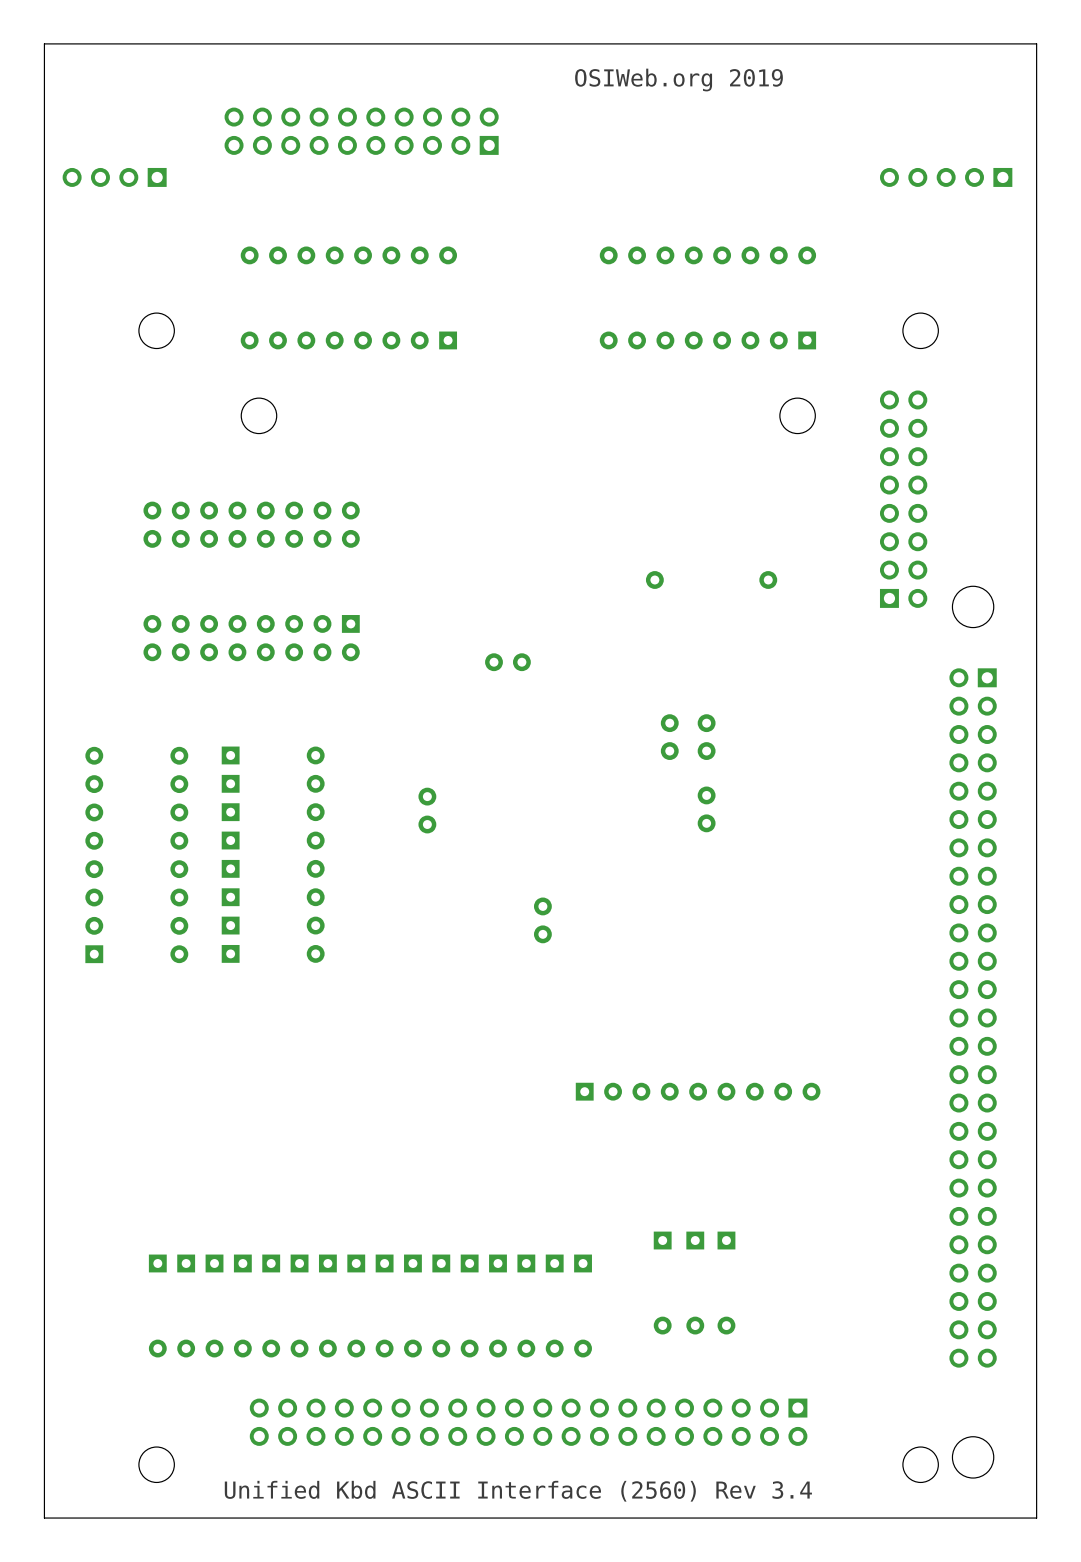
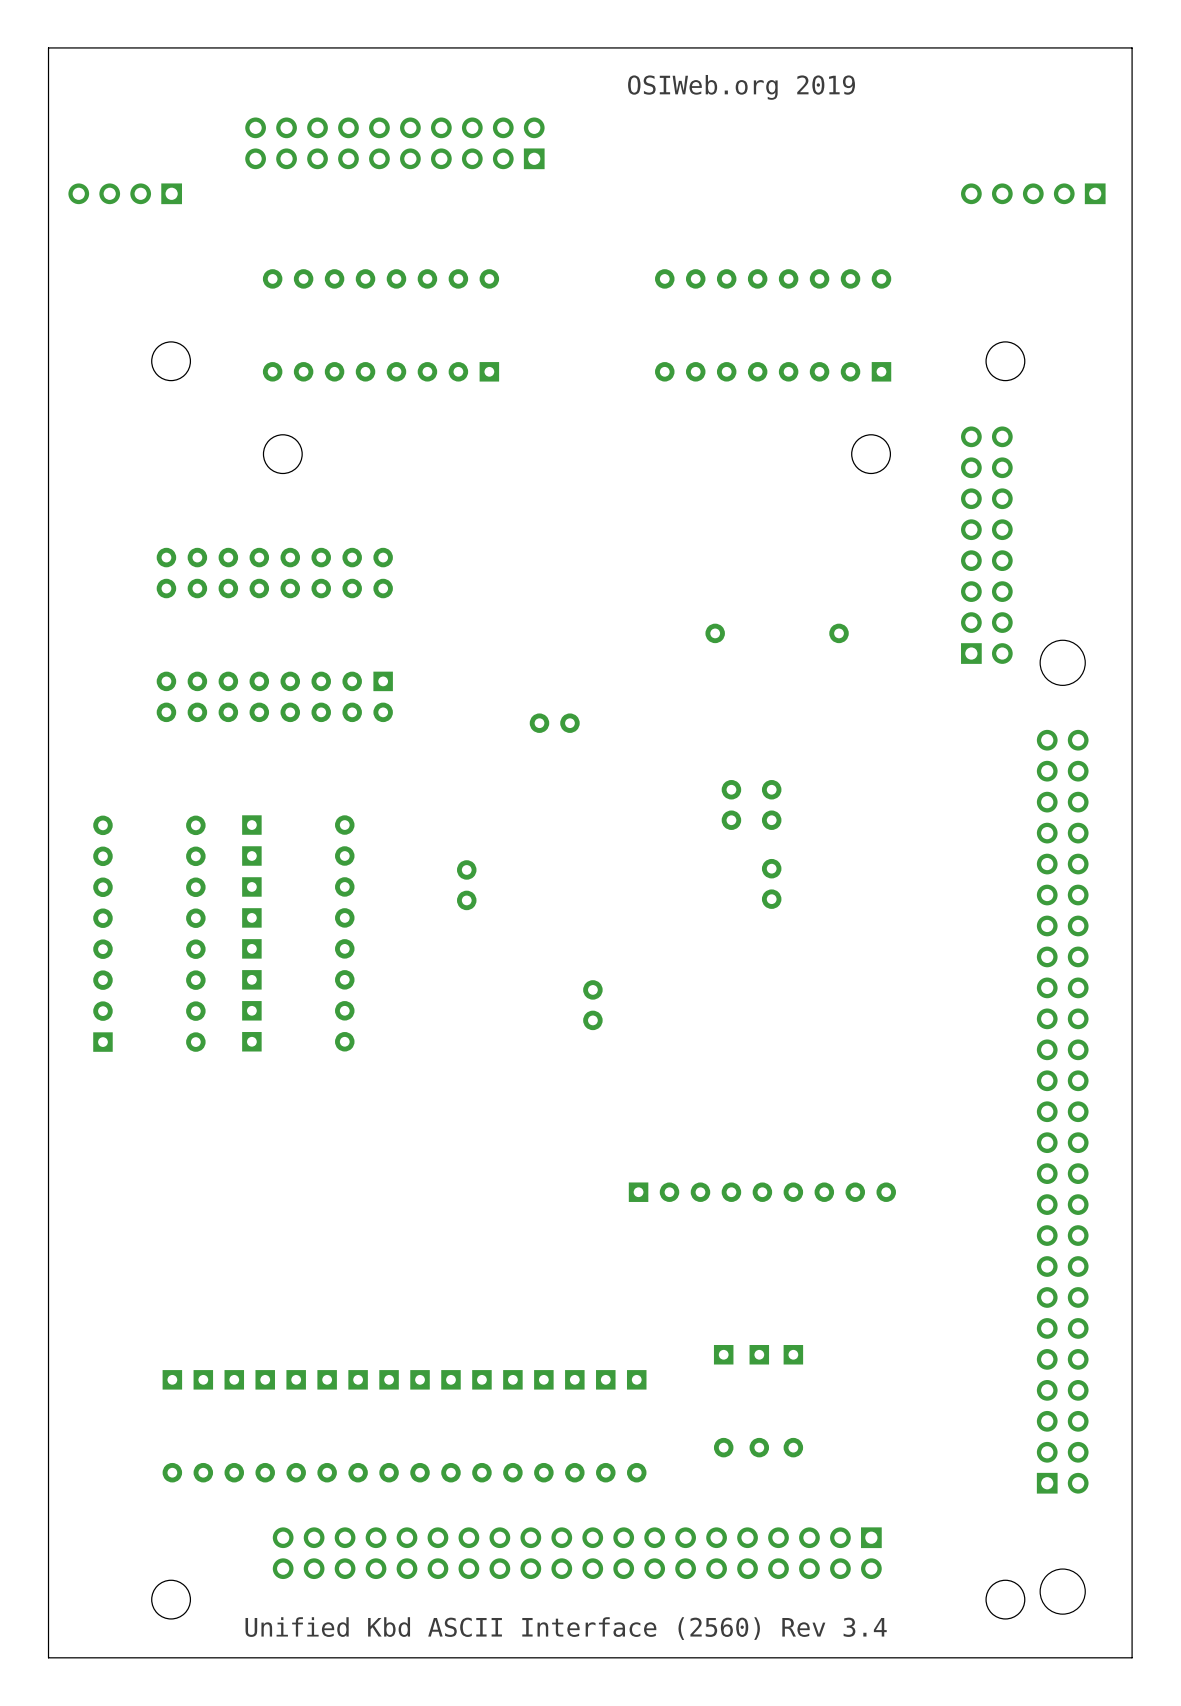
part rotation: 0° (973, 1017) -> 180° (1062, 1111)

